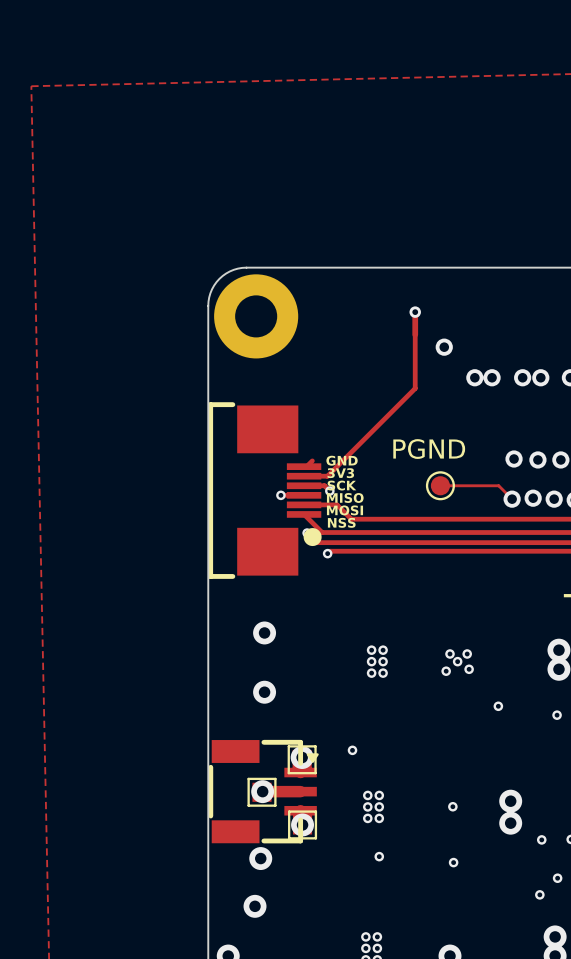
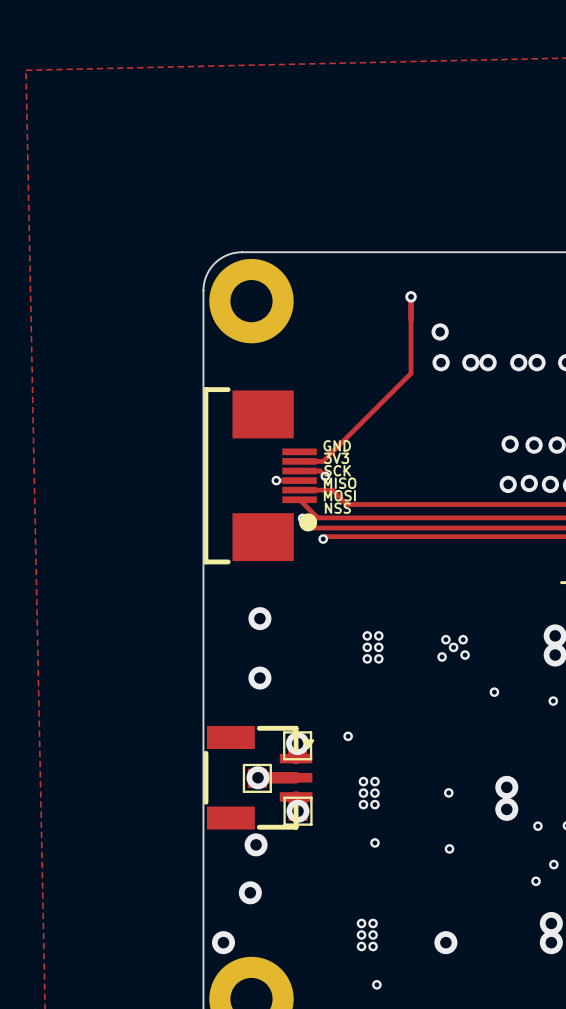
via: none -> (441, 362)
text: PGND (429, 449) -> none
track: (312, 460) (306, 466) -> none
track: (440, 485) (498, 485) (512, 499) -> none
part: (440, 485) -> none

